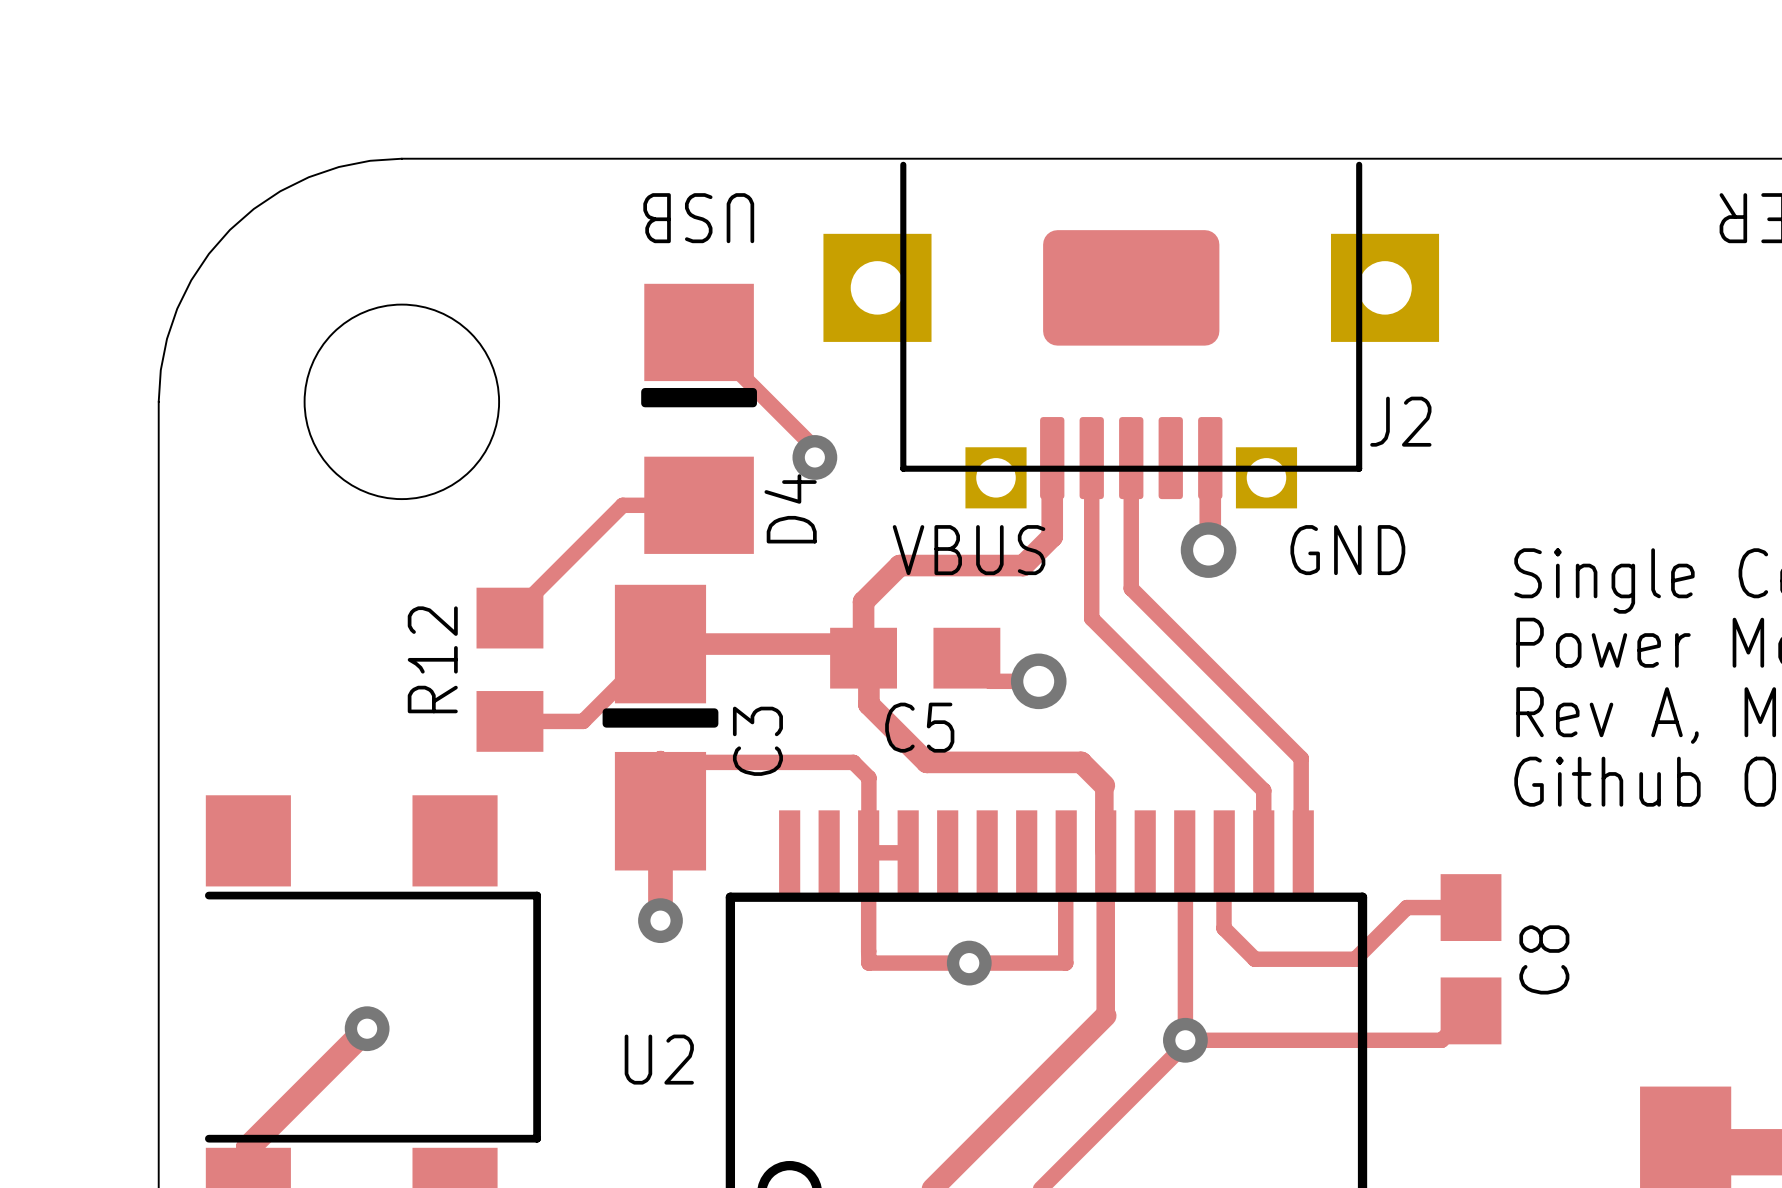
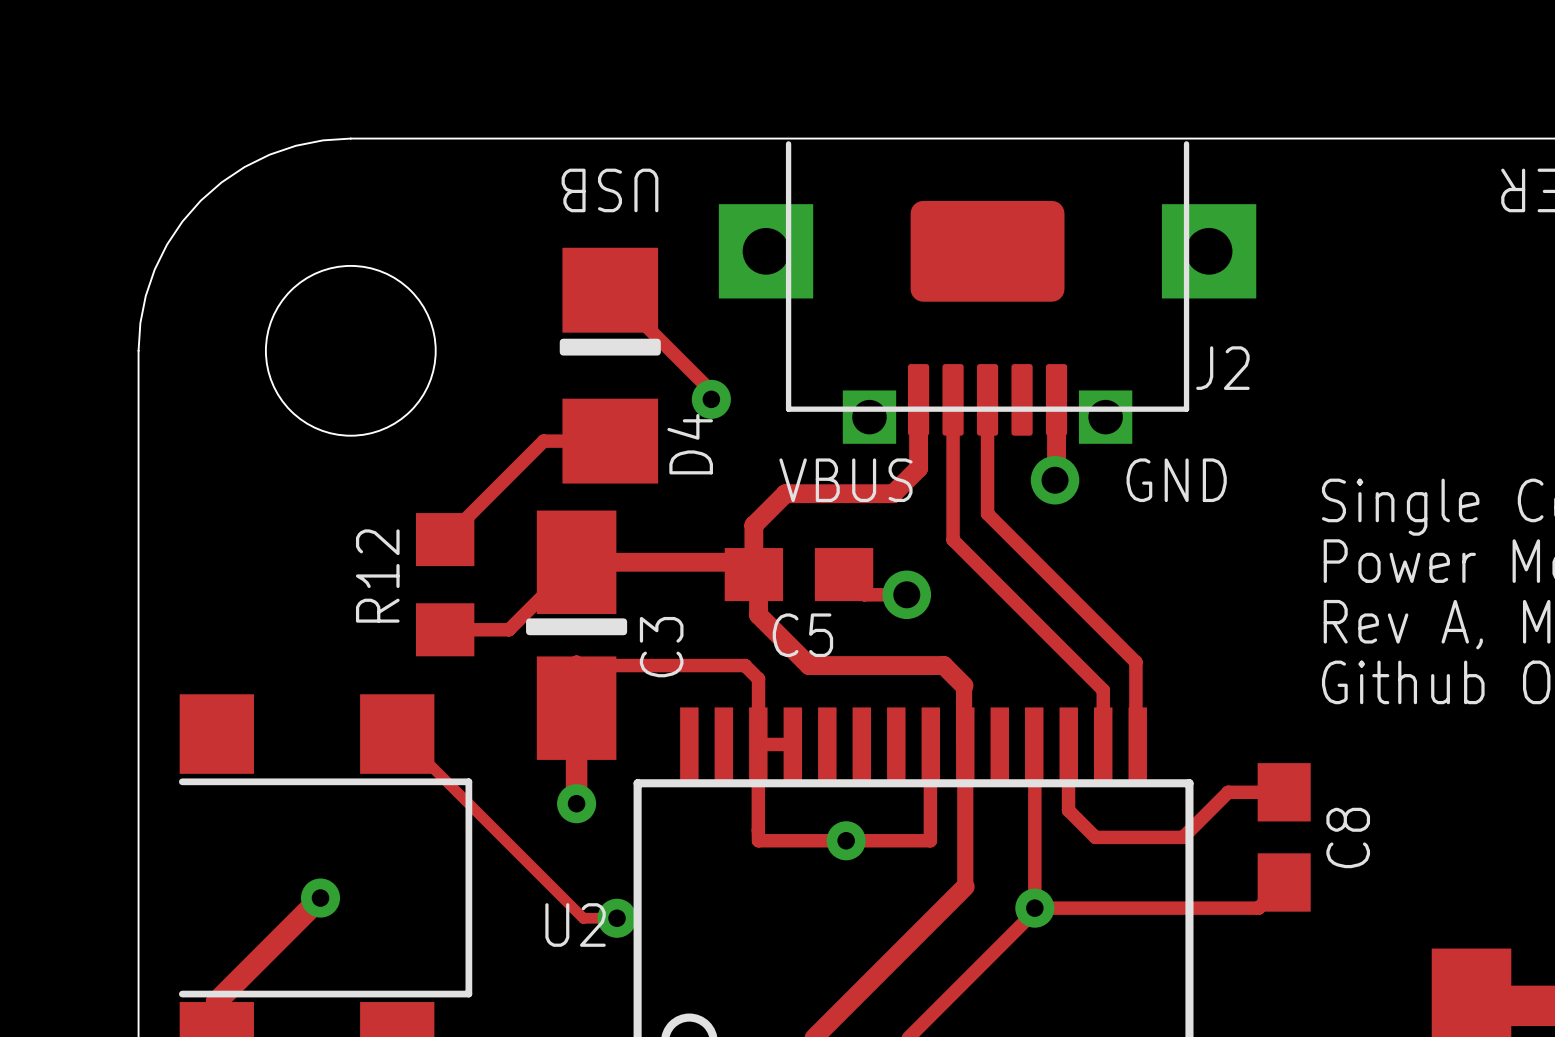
track: none -> (397, 734) (583, 918) (617, 918)
via: none -> (617, 918)

